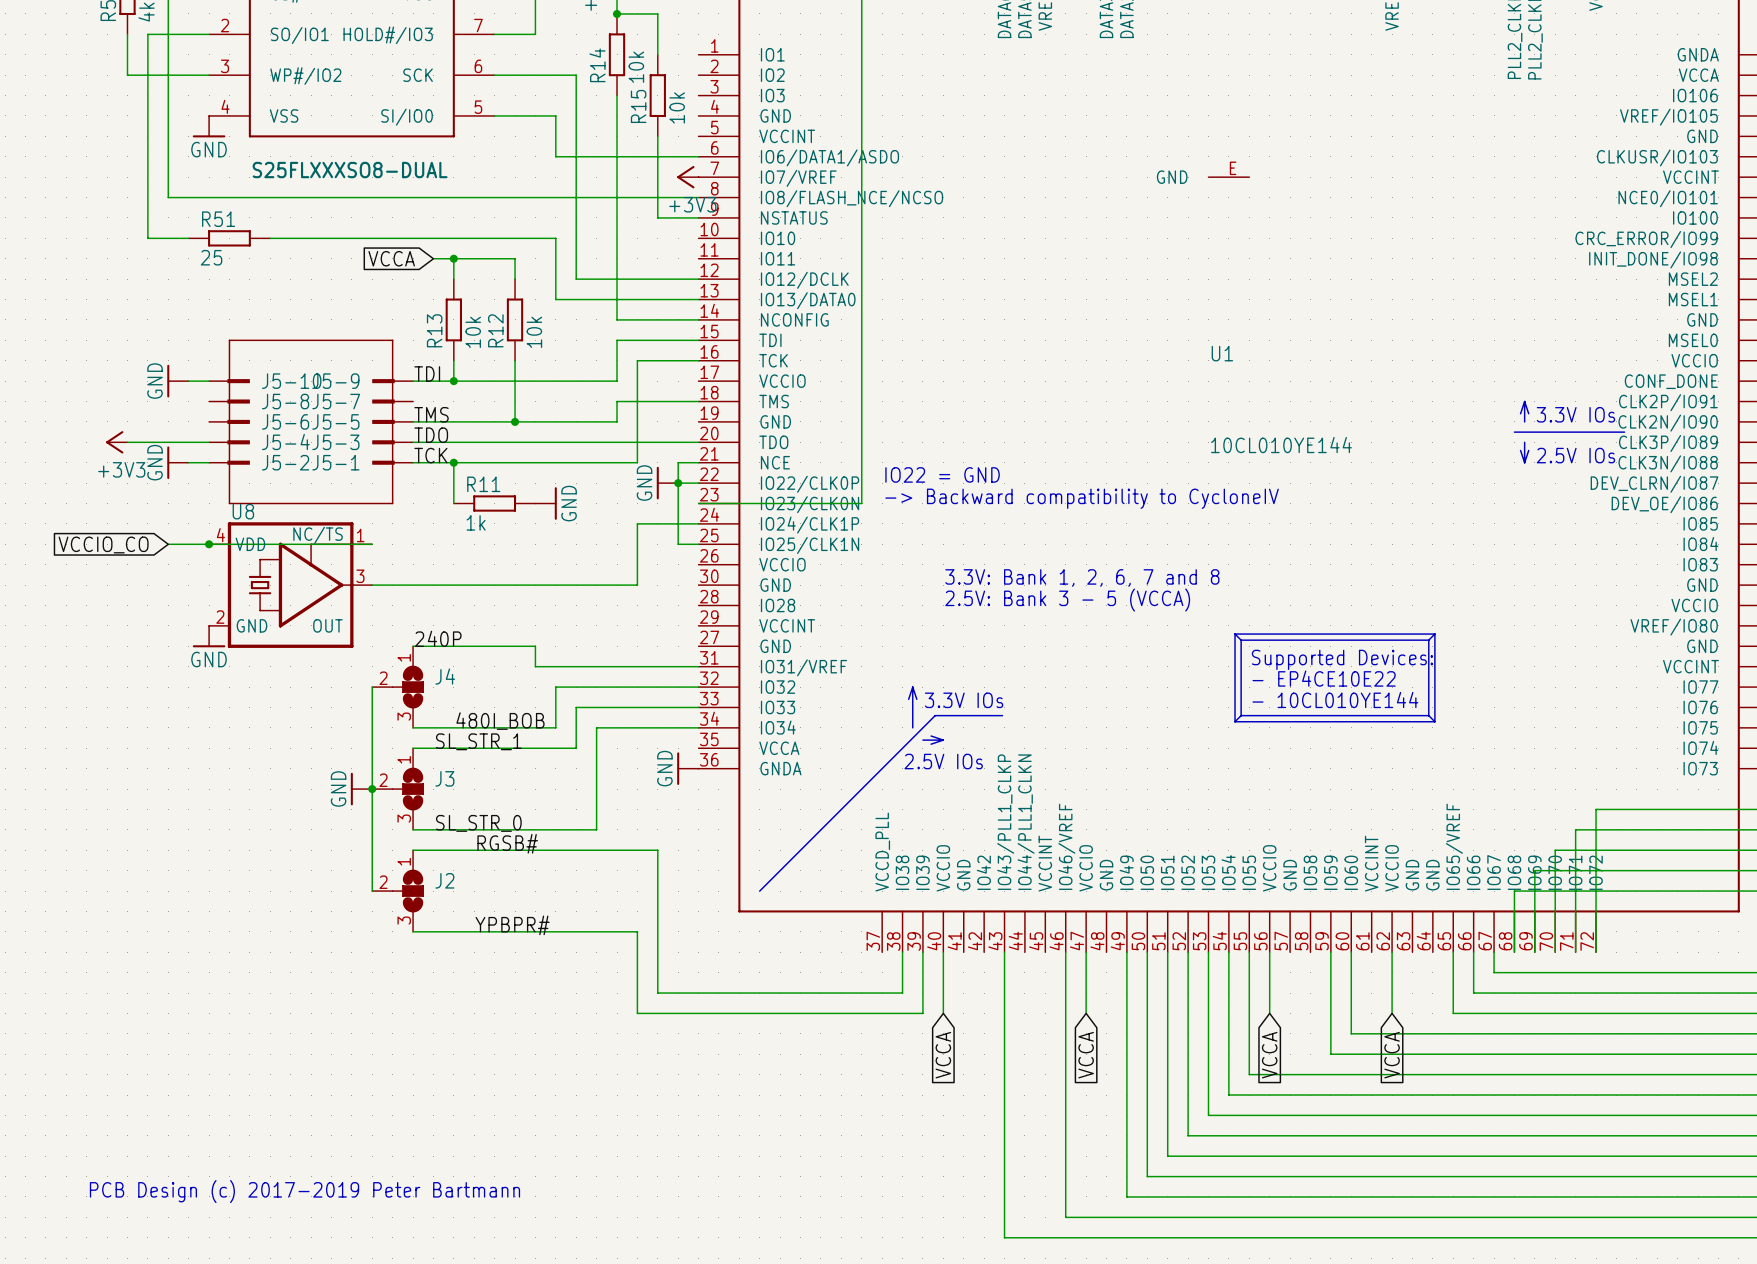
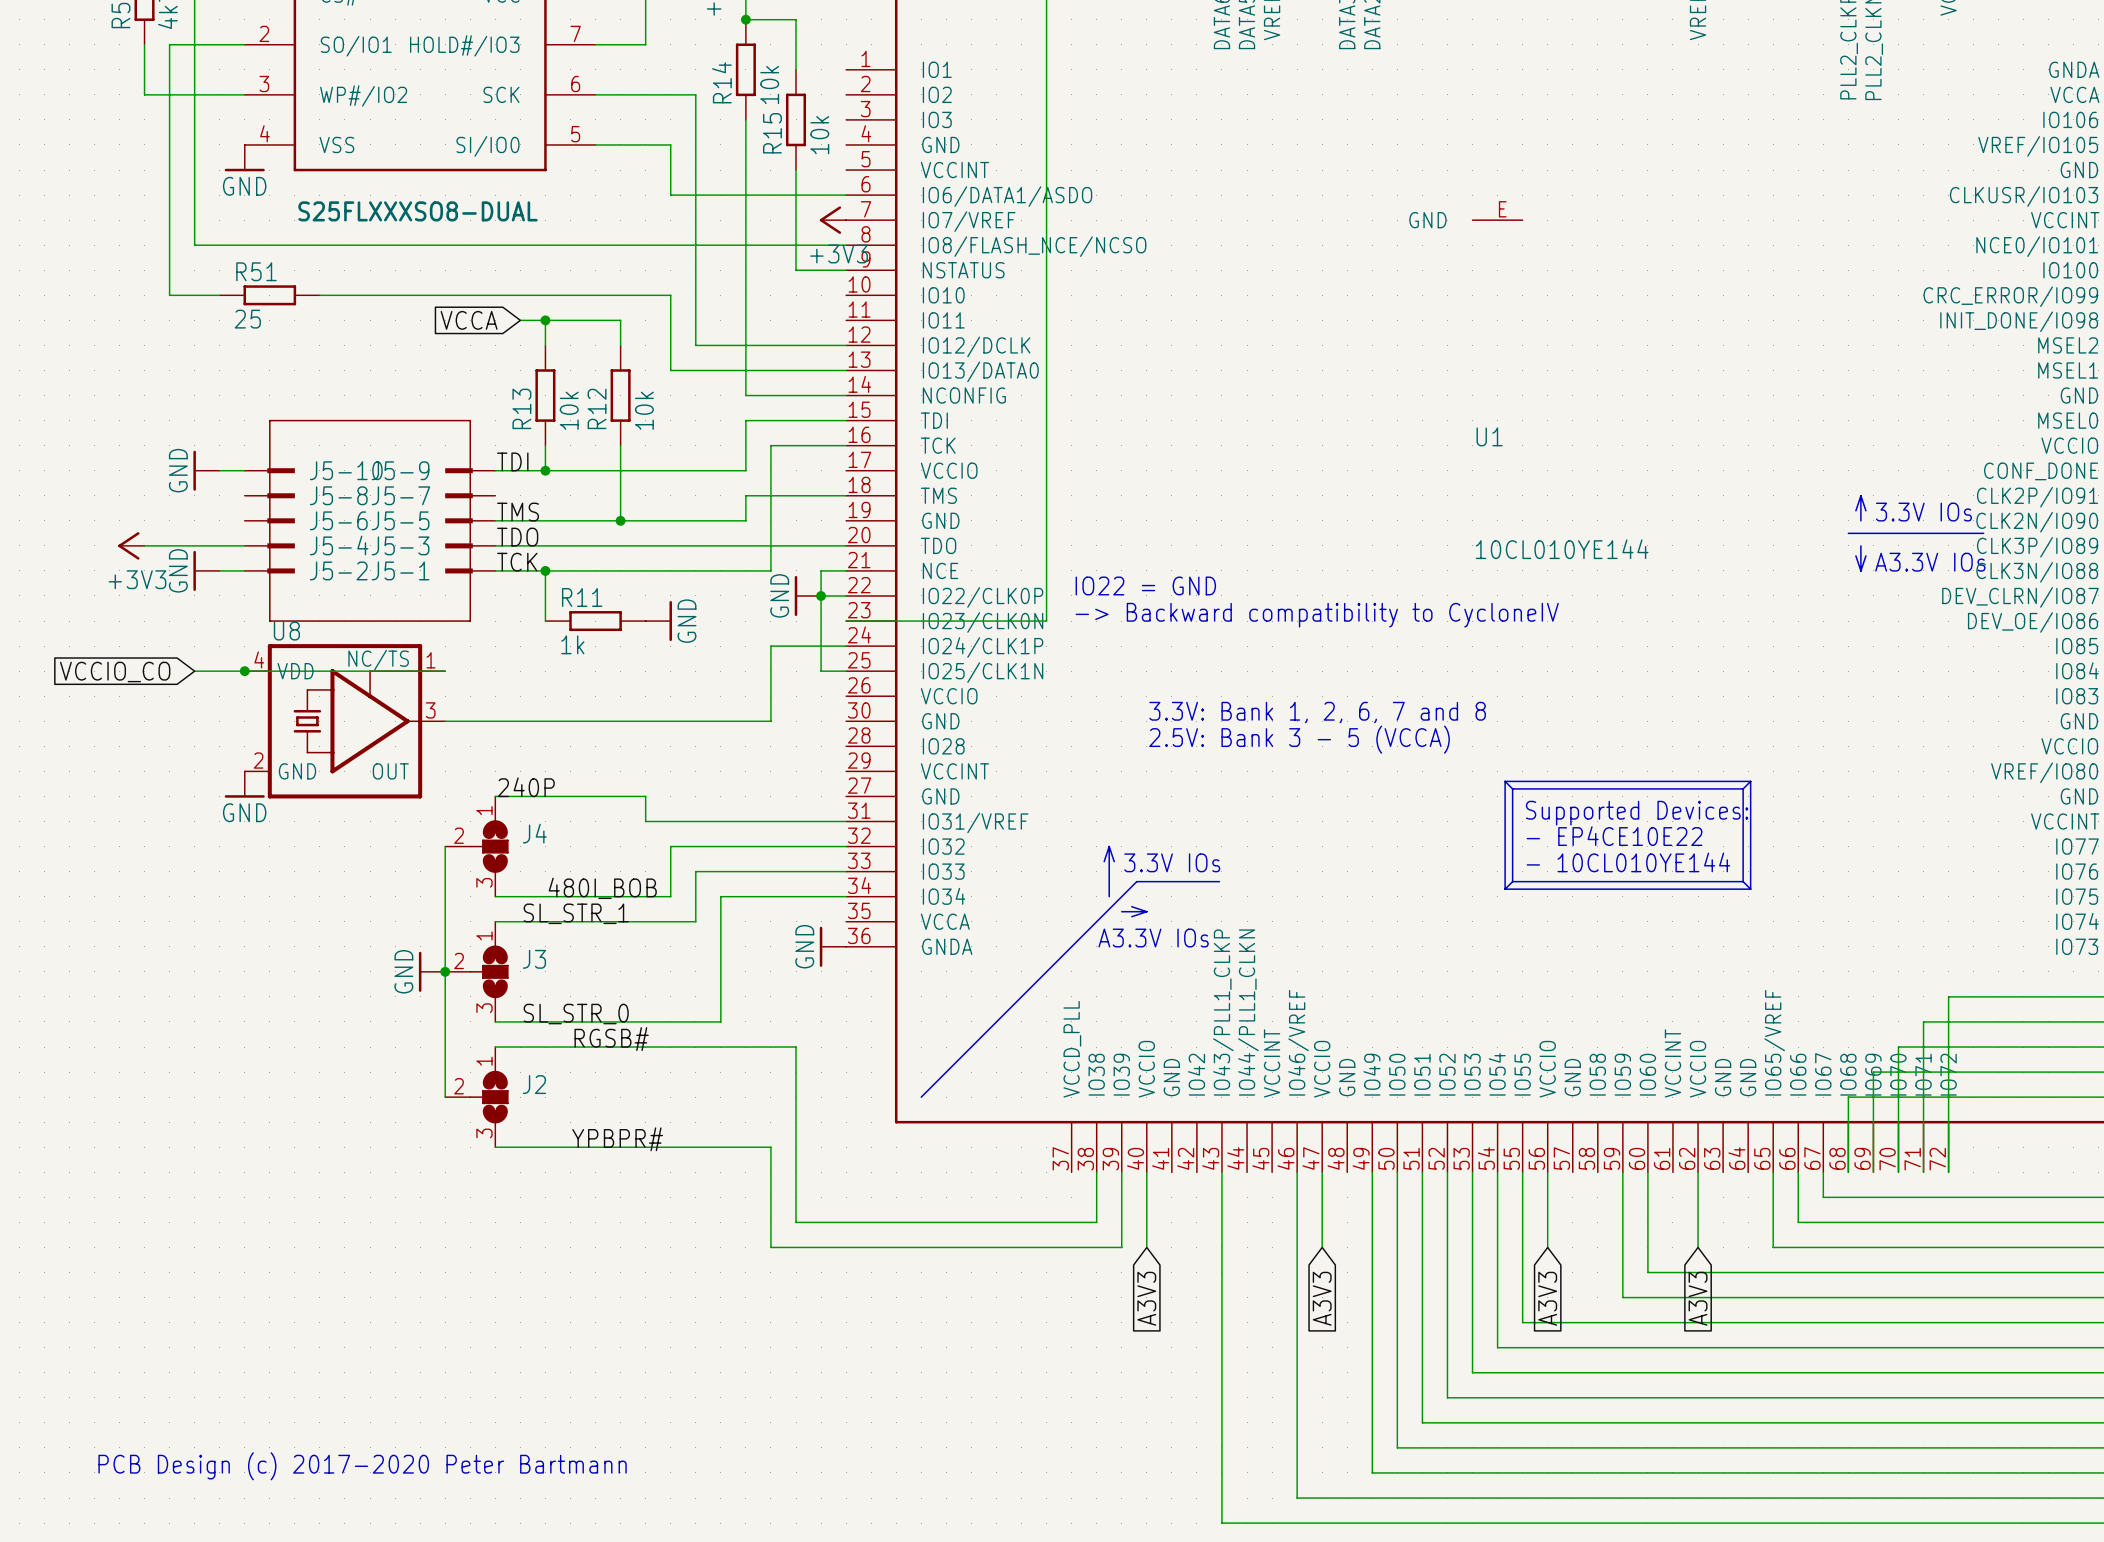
text: 2.5V IOs (1575, 455) -> A3.3V IOs (1930, 562)
text: 2.5V IOs (943, 761) -> A3.3V IOs (1153, 938)
global label: VCCA (943, 1055) -> A3V3 (1146, 1298)
global label: VCCA (1086, 1055) -> A3V3 (1322, 1298)
global label: VCCA (1269, 1055) -> A3V3 (1547, 1298)
global label: VCCA (1392, 1055) -> A3V3 (1698, 1298)
text: PCB Design (c) 2017-2019 Peter Bartmann (304, 1191) -> PCB Design (c) 2017-2020 Peter Bartmann (362, 1466)

